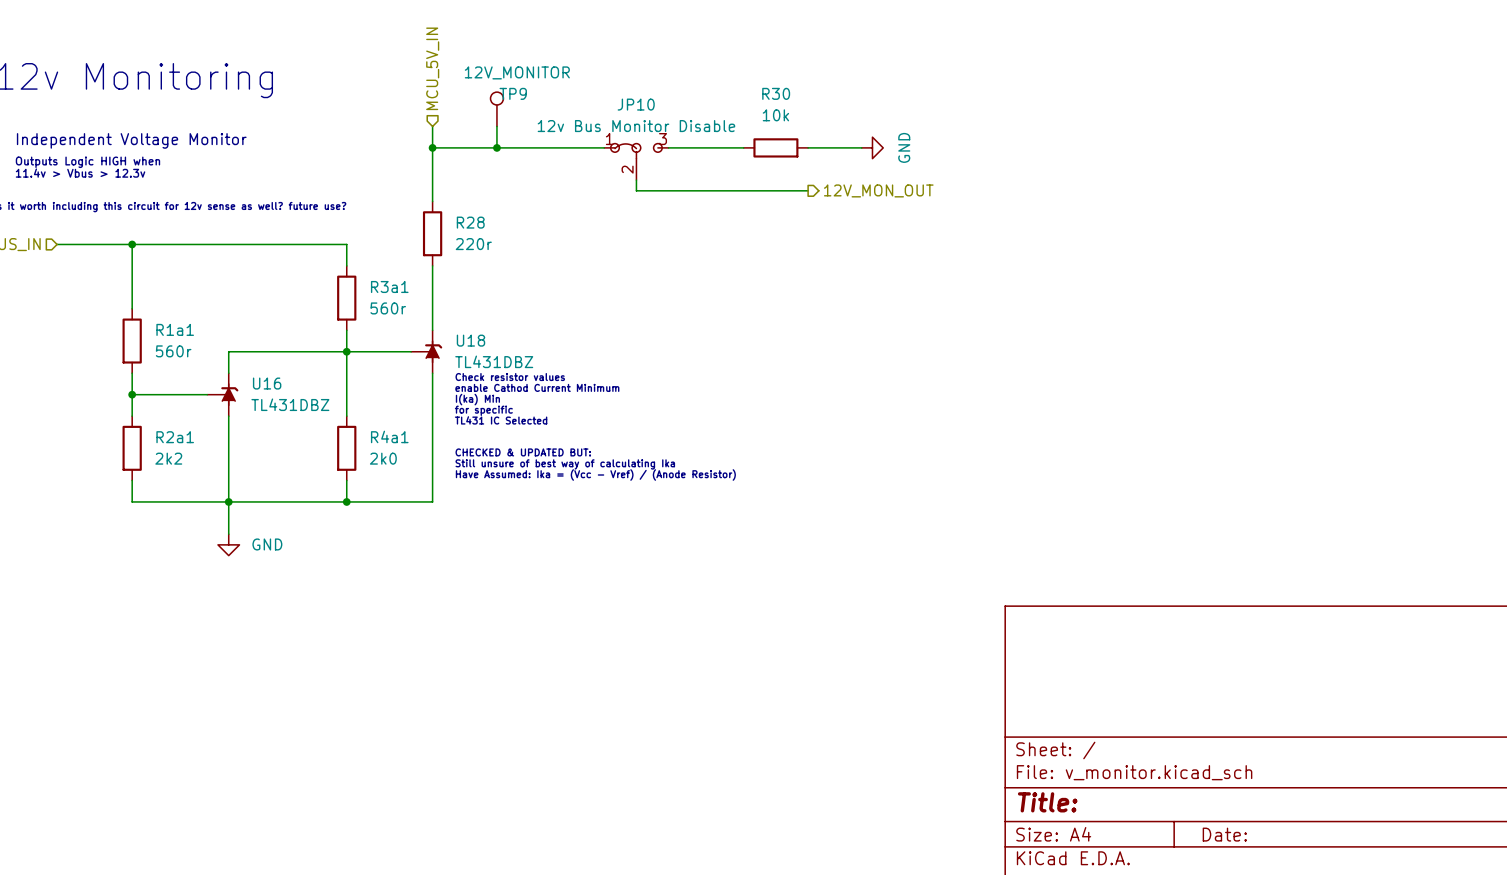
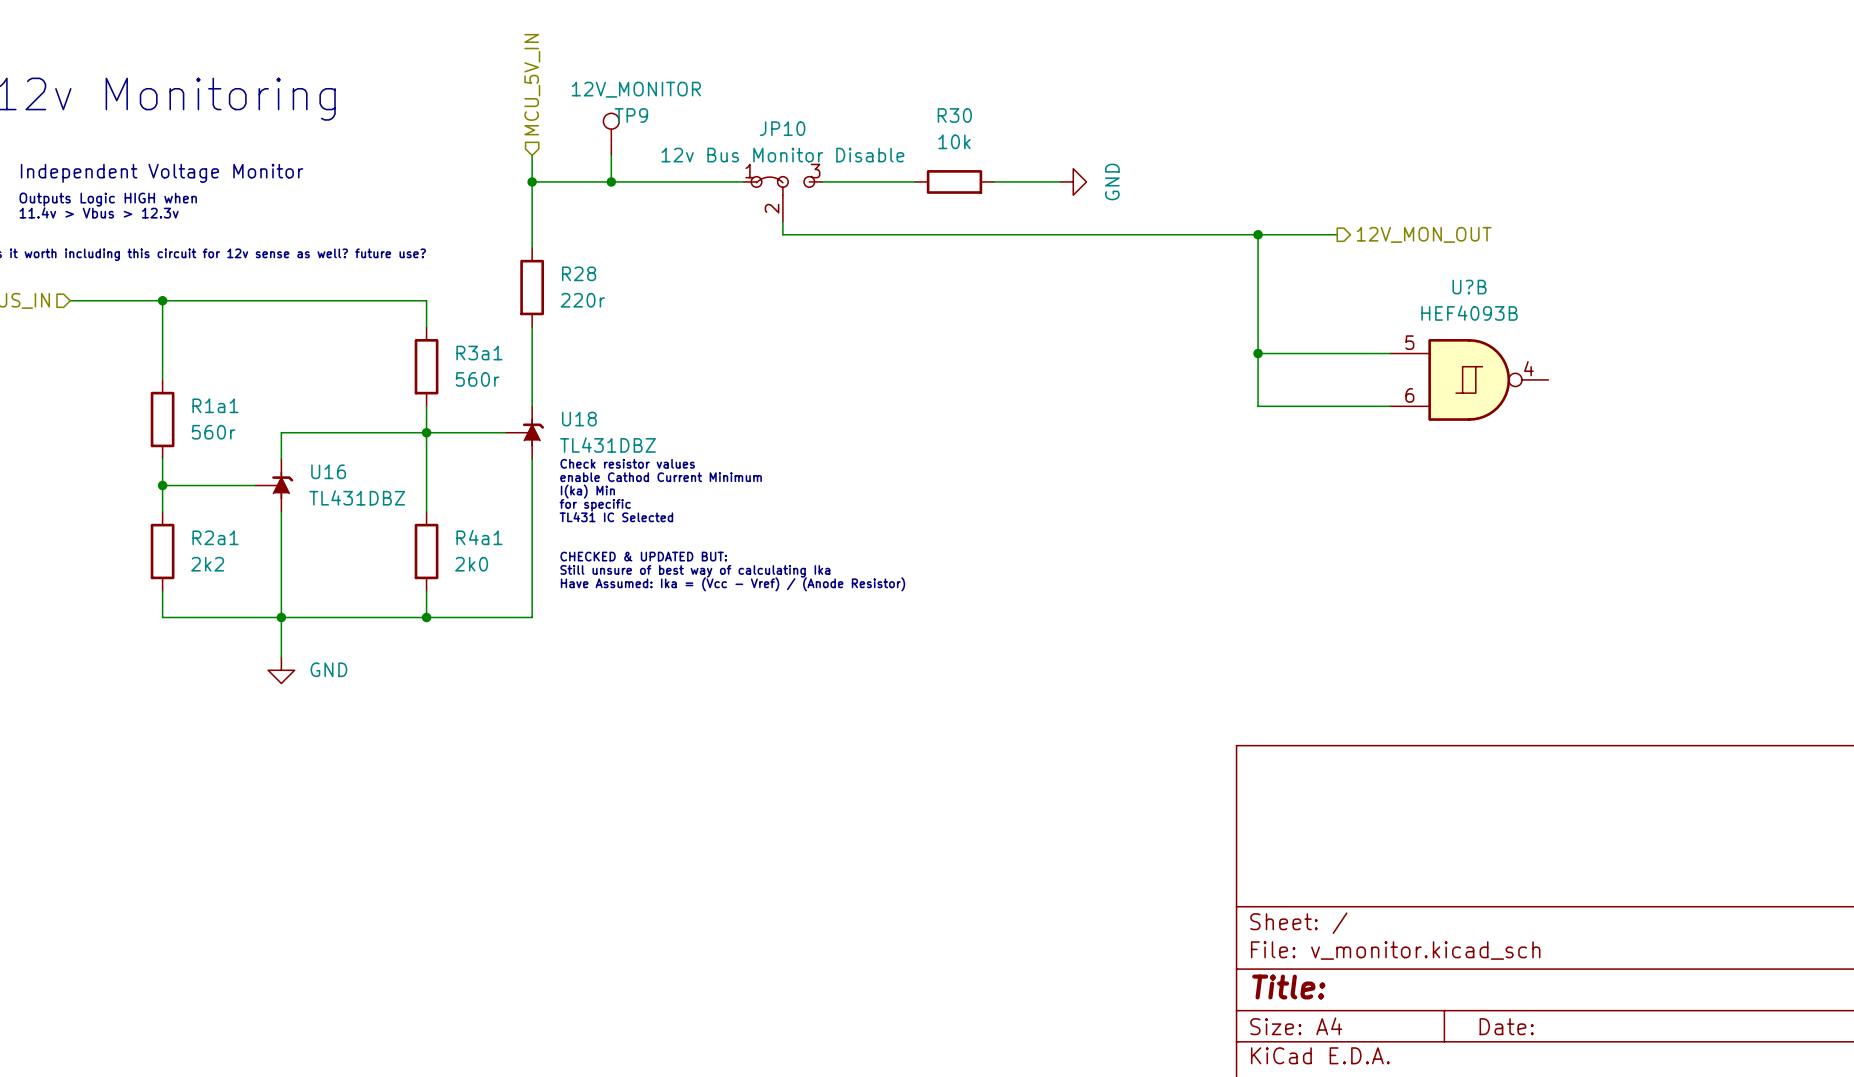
wire: none -> (994, 234) (1337, 234)
hierarchical label: 12V_MON_OUT (878, 190) -> none
wire: none -> (1258, 234) (1258, 406) (1390, 406)
junction: none -> (1258, 234)
hierarchical label: none -> 12V_MON_OUT (1424, 234)
wire: none -> (1258, 353) (1390, 353)
junction: none -> (1258, 353)
U?B: none -> HEF4093B (1469, 379)

